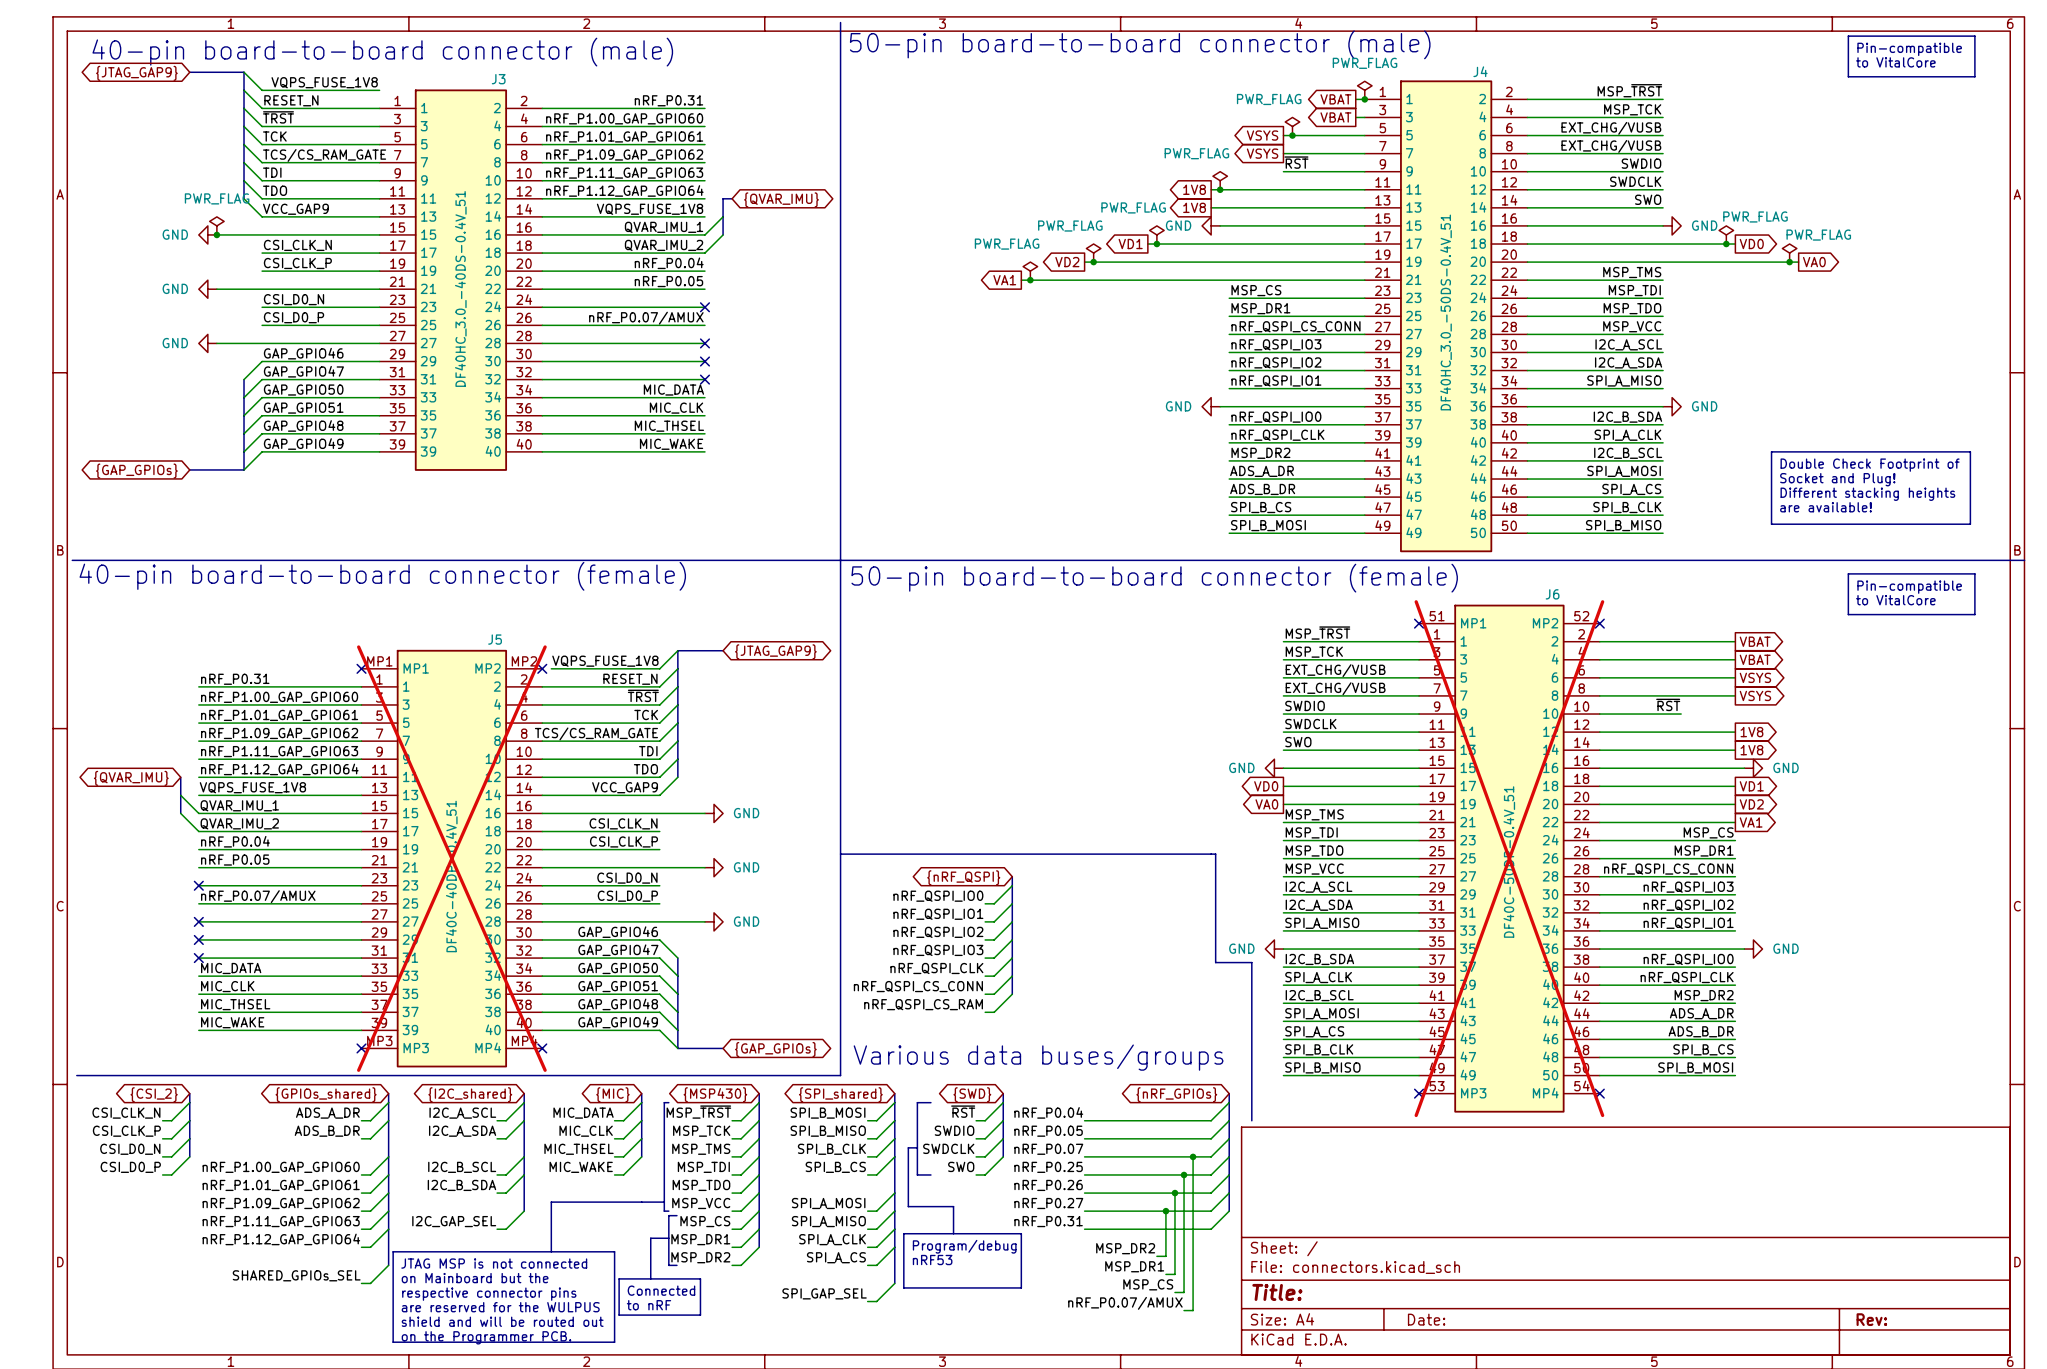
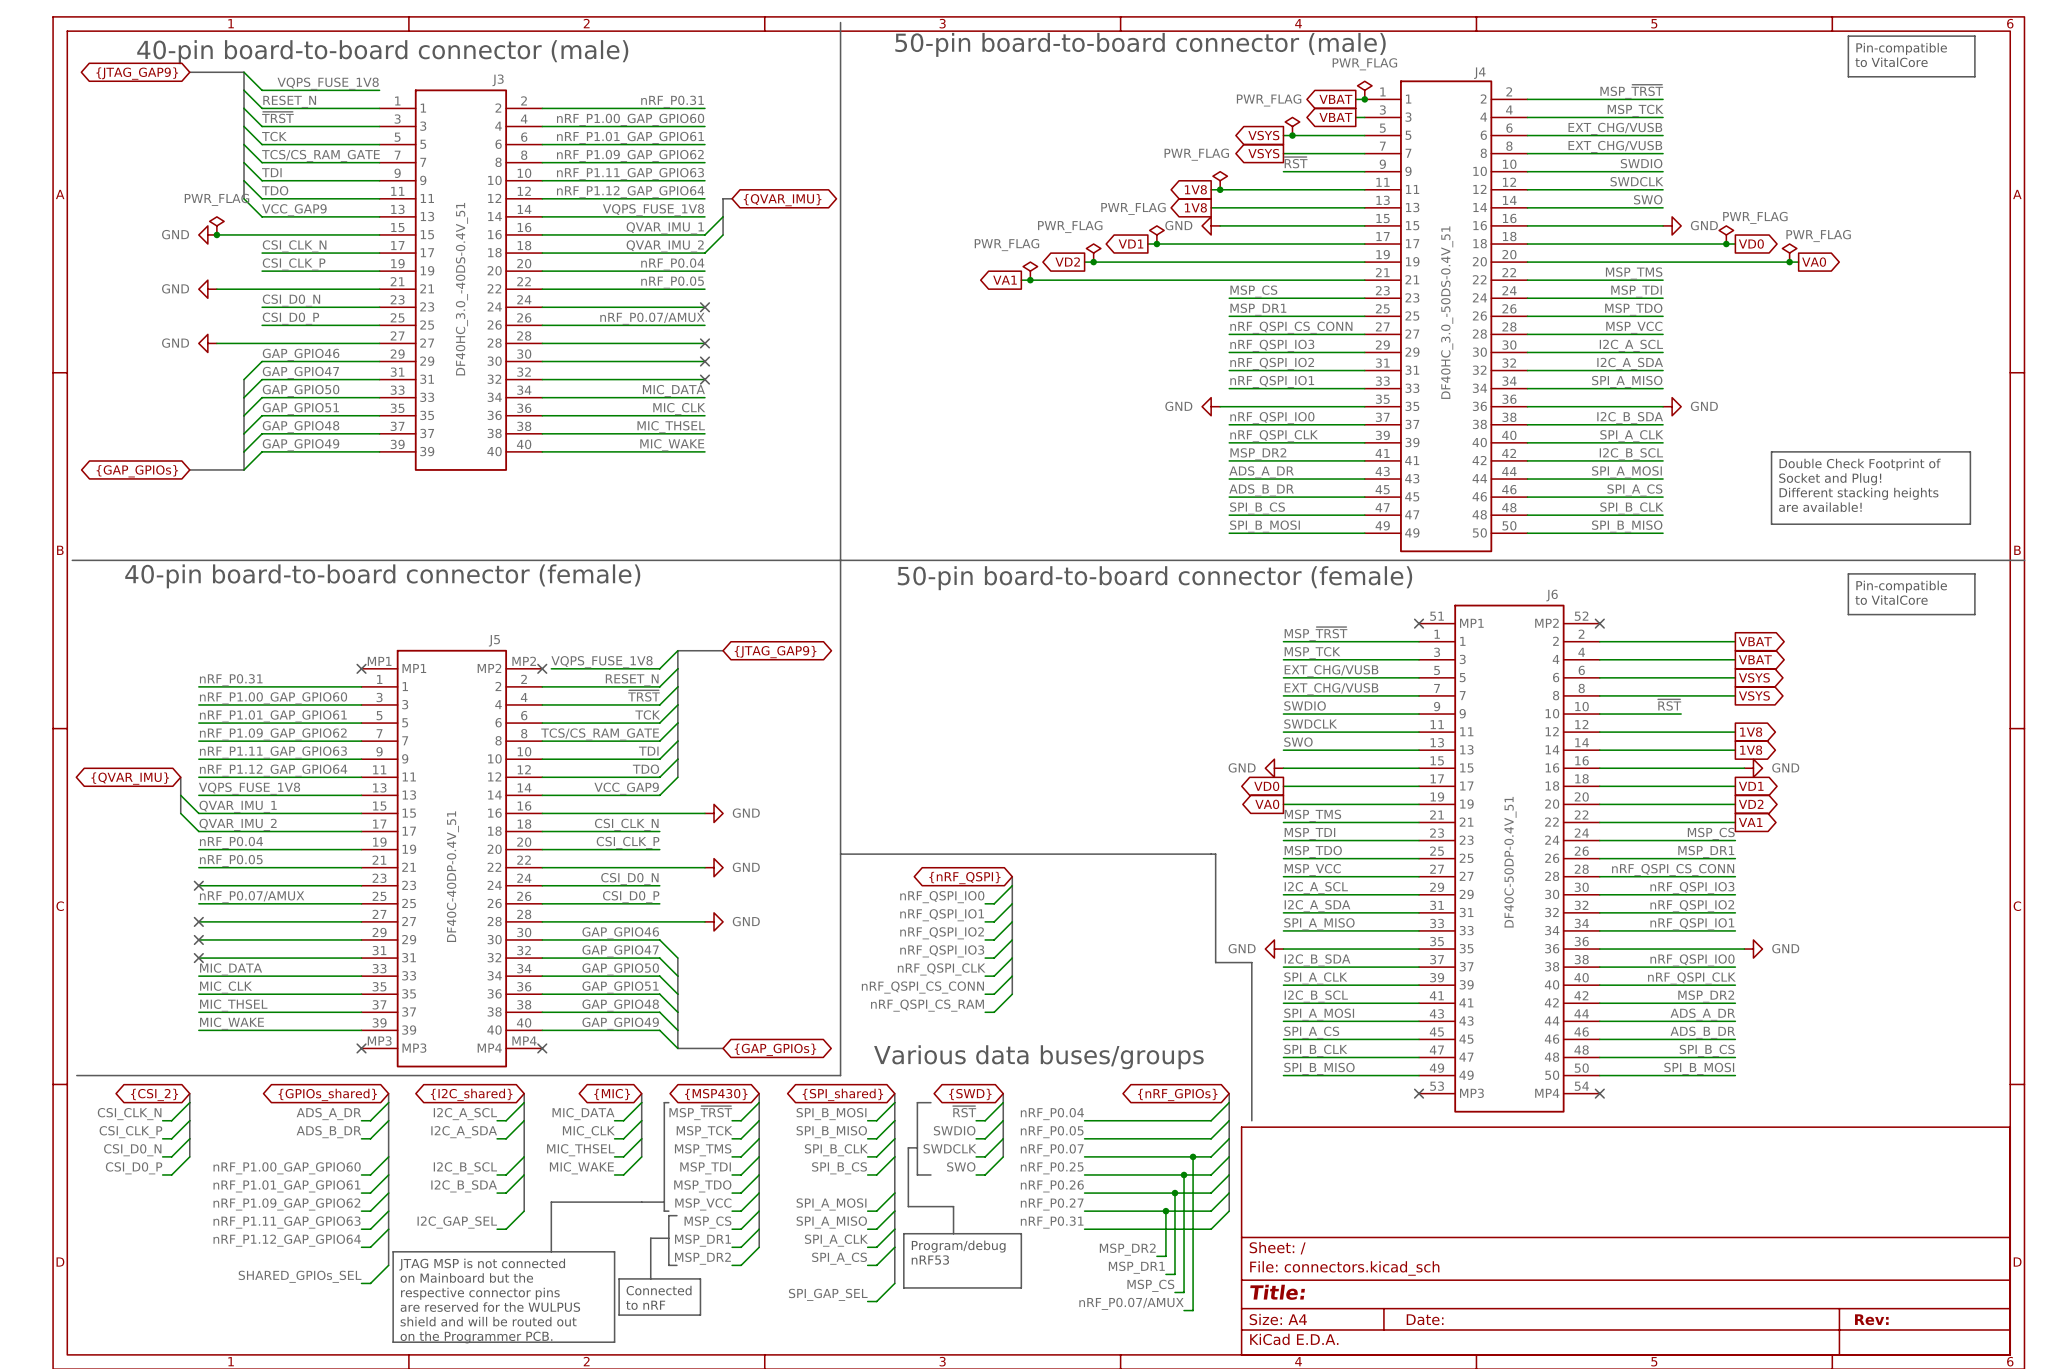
J5 do-not-place cross: (451, 858) -> none
J6 do-not-place cross: (1509, 858) -> none

